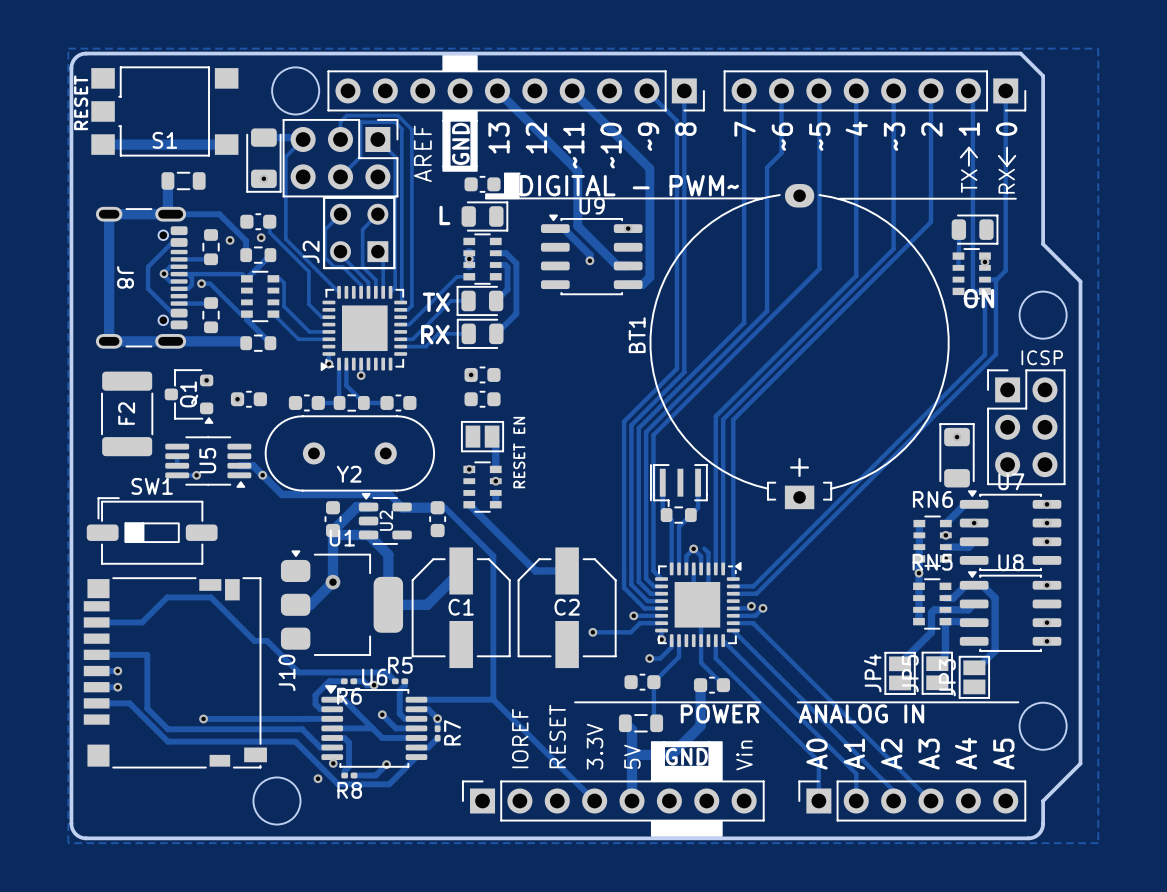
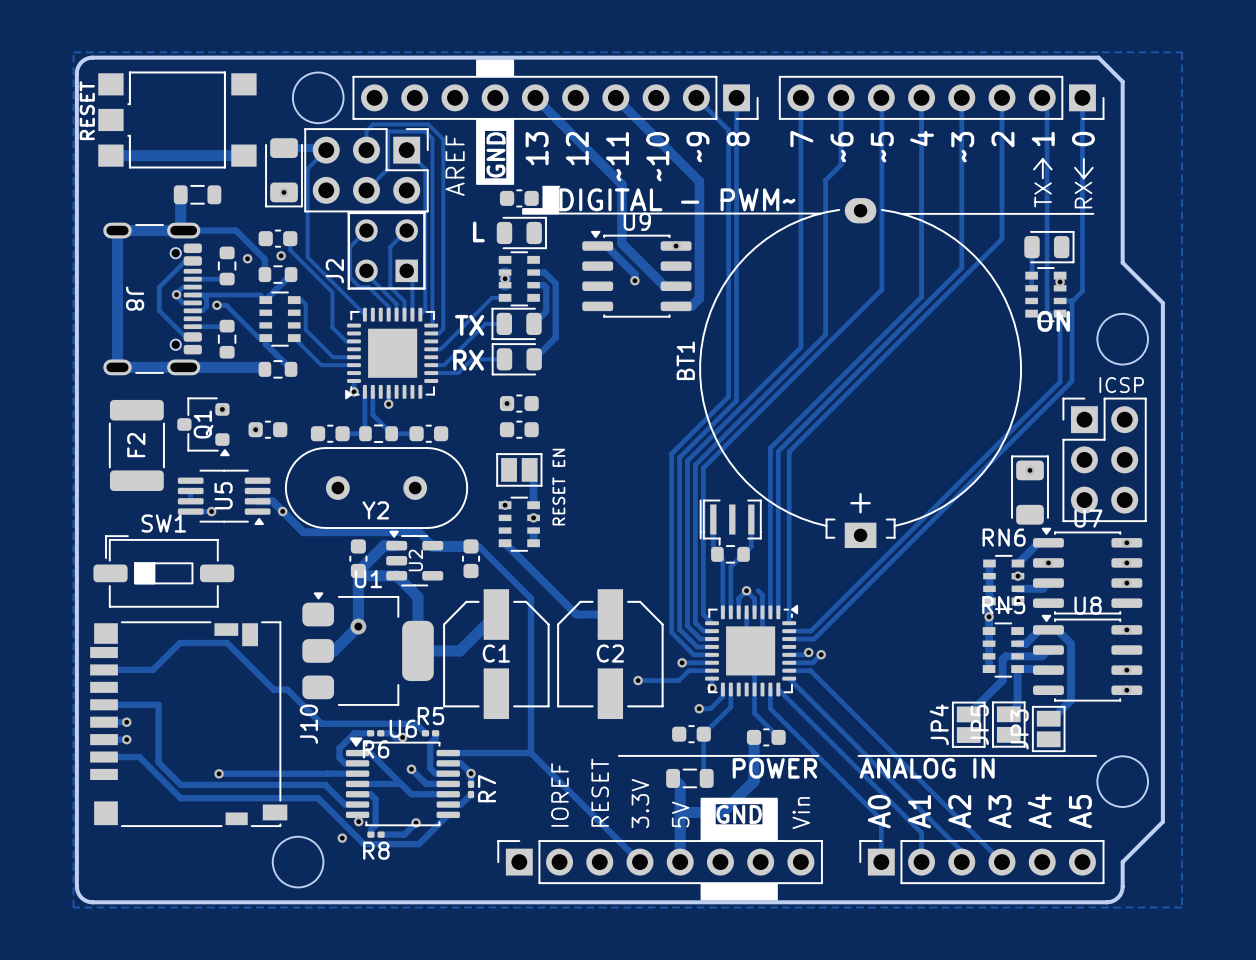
S1 name: S1 (164, 140) -> none

